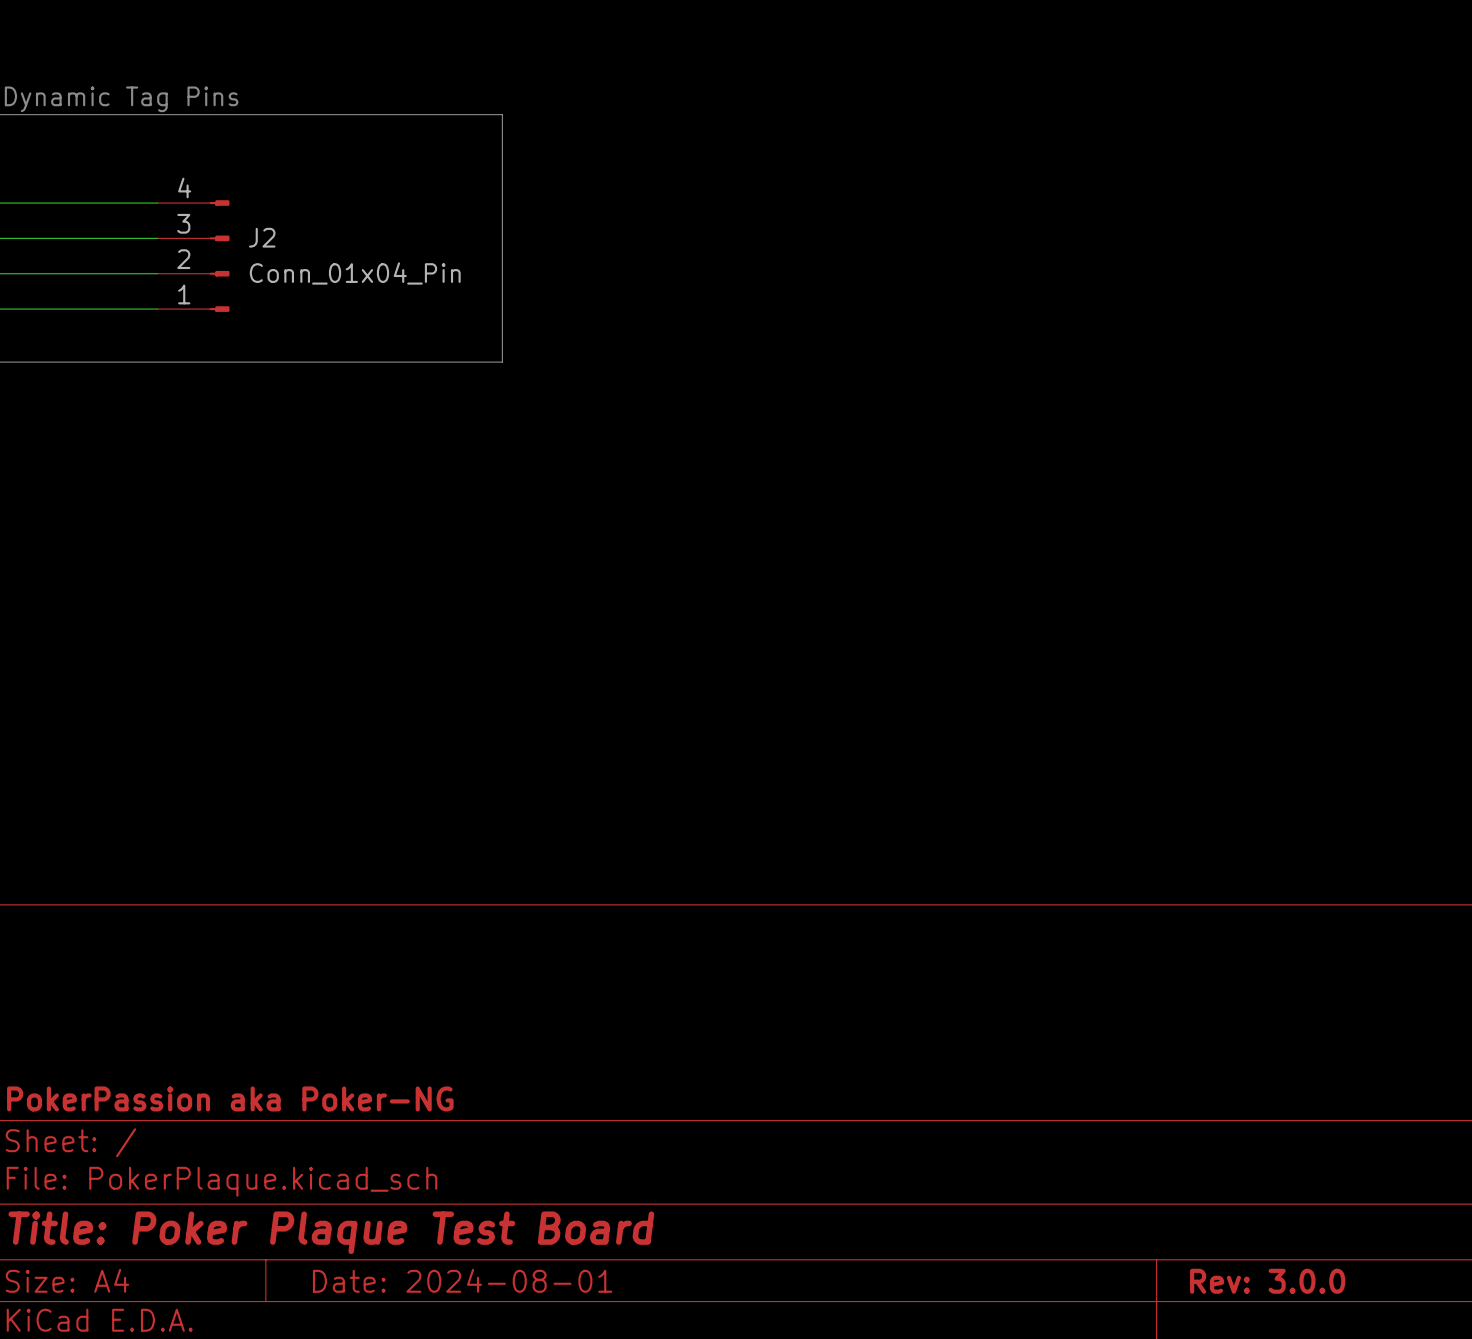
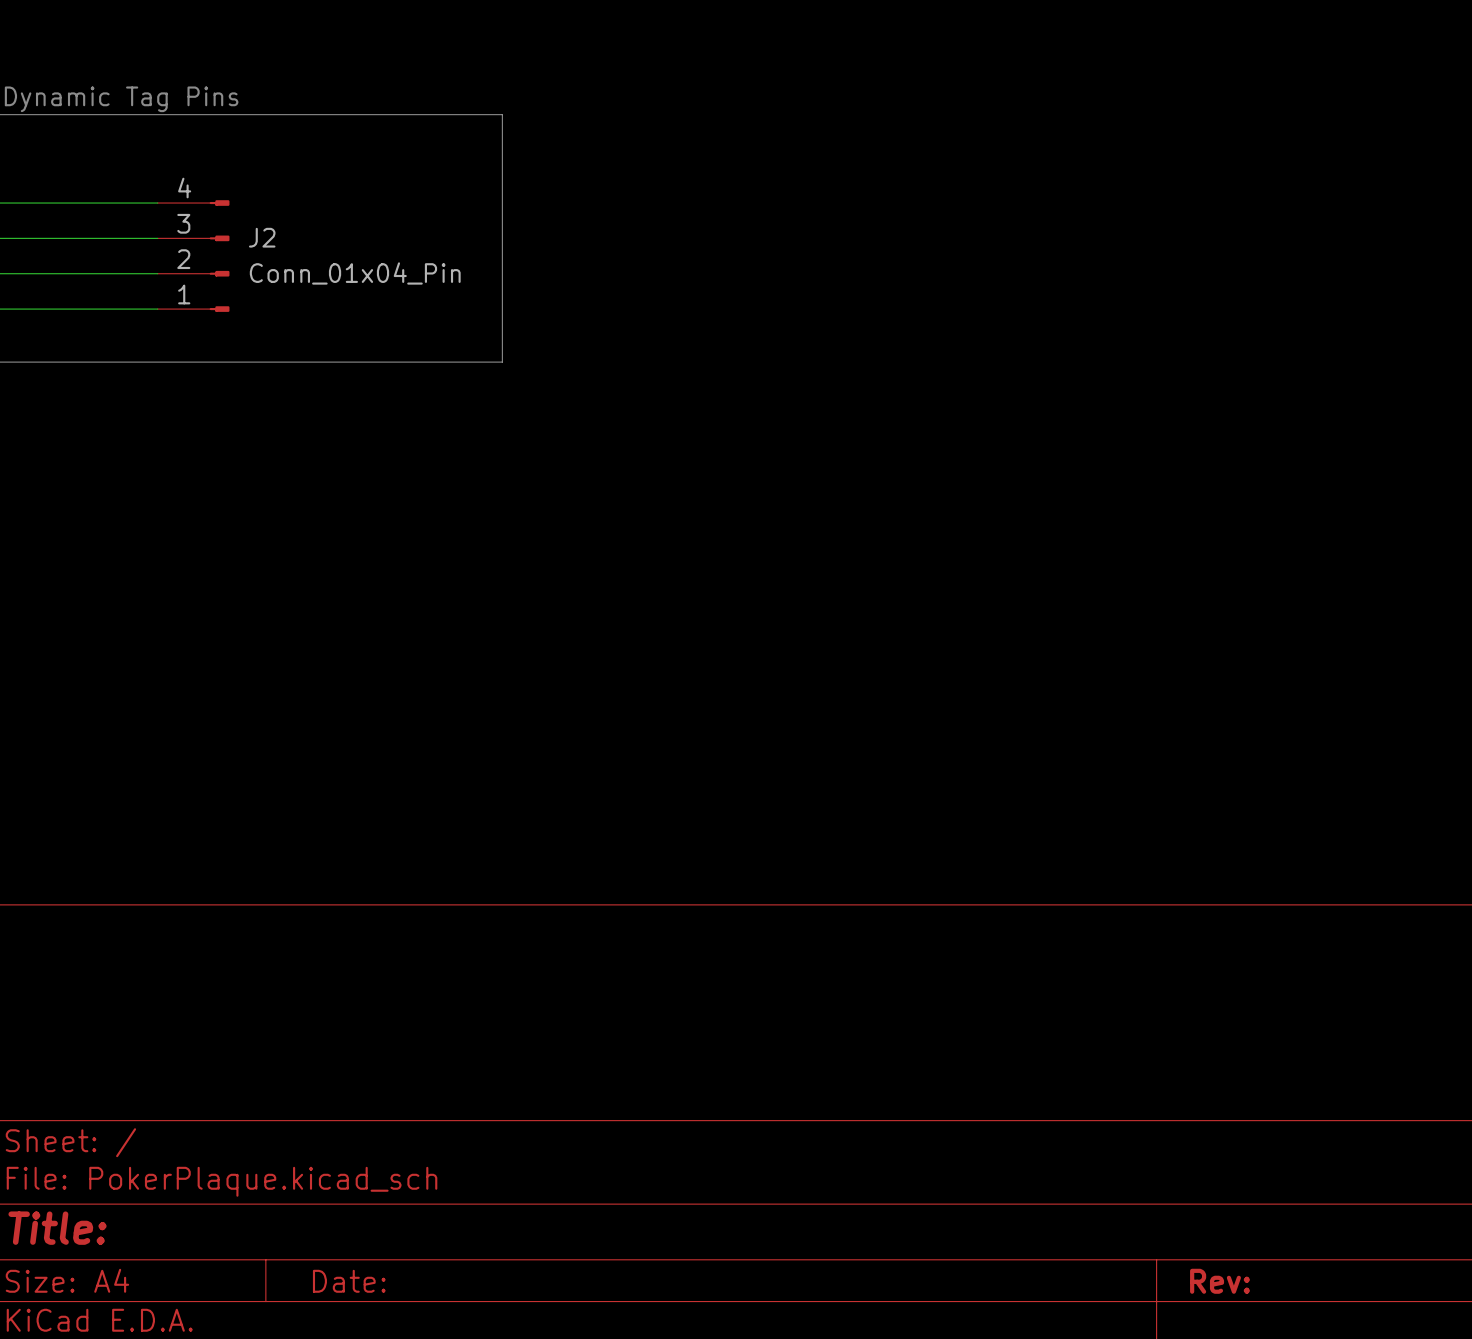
title block: PokerPassion aka Poker-NG (230, 1098) -> none
title block: Title: Poker Plaque Test Board (331, 1232) -> Title: (57, 1228)
title block: Date: 2024-08-01 (462, 1280) -> Date: (349, 1281)
title block: Rev: 3.0.0 (1267, 1281) -> Rev: (1219, 1281)

